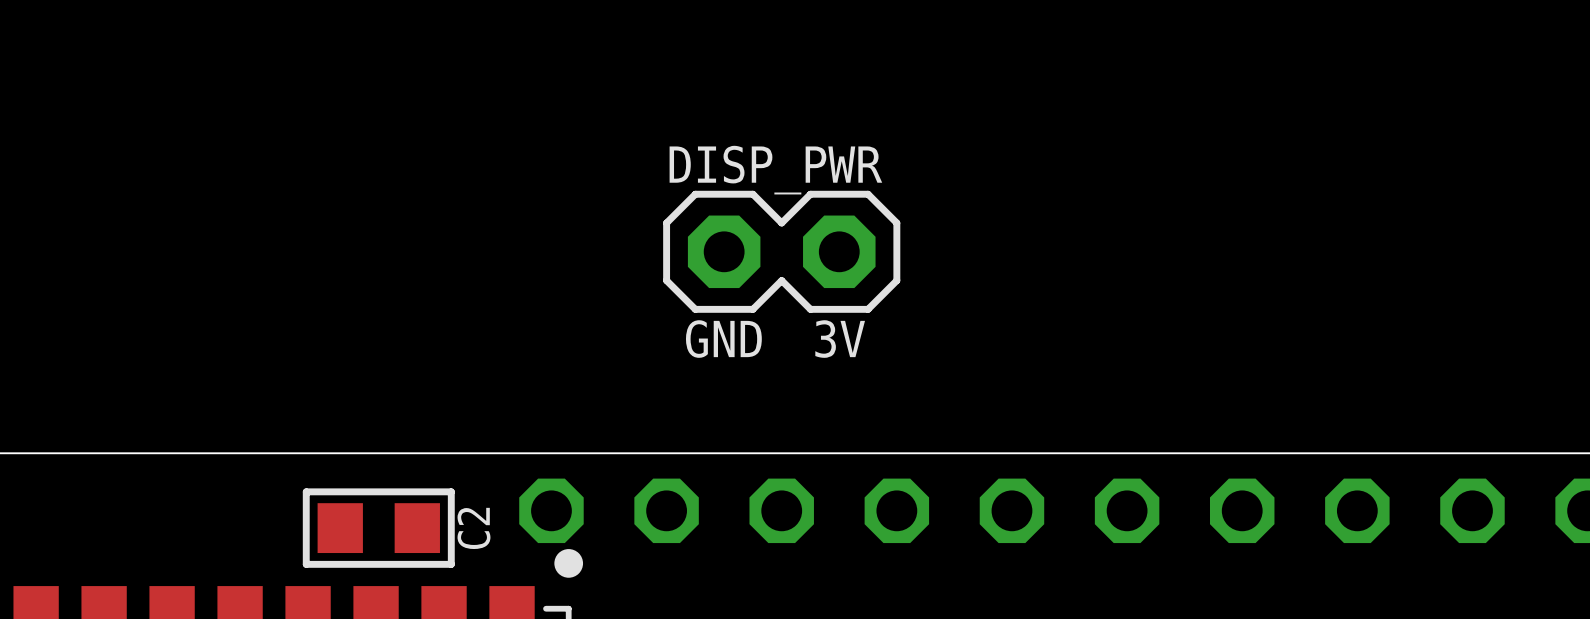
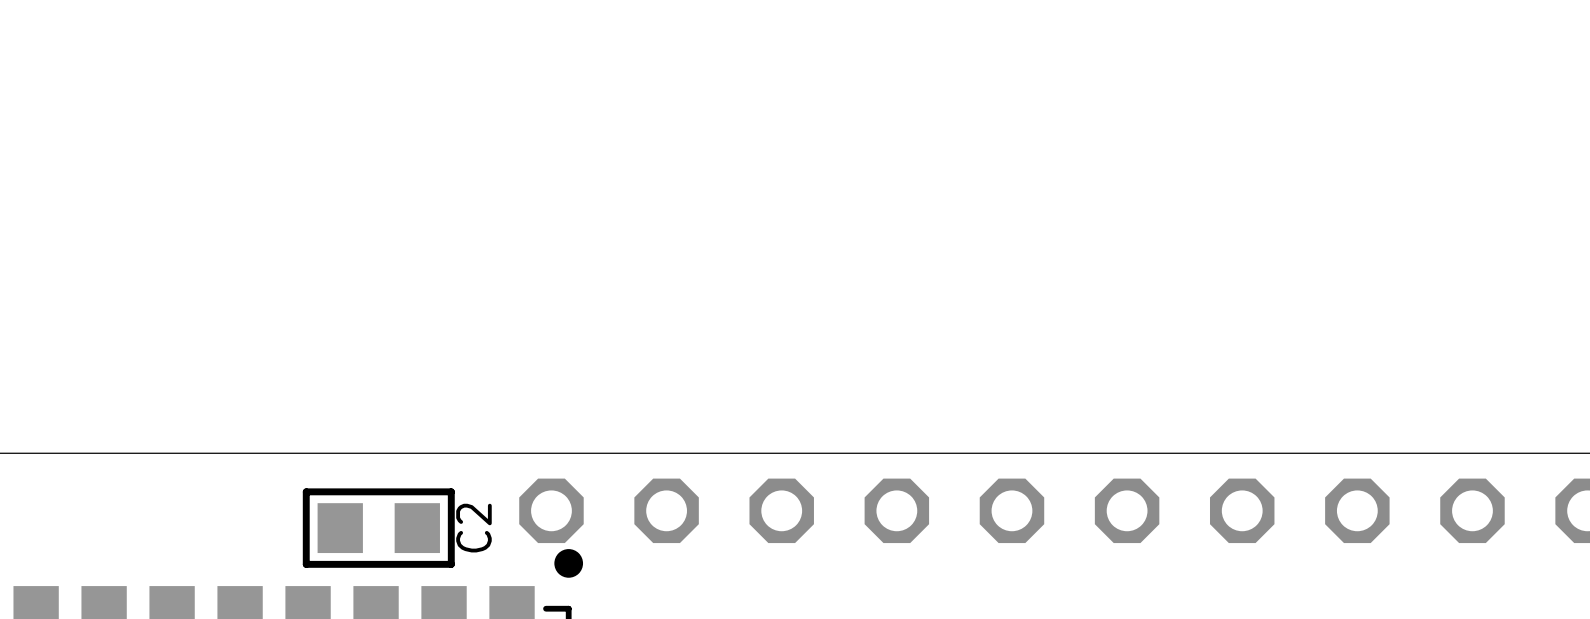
DISP_PWR: (781, 251) -> none
text: GND (723, 339) -> none
text: 3V (840, 339) -> none

